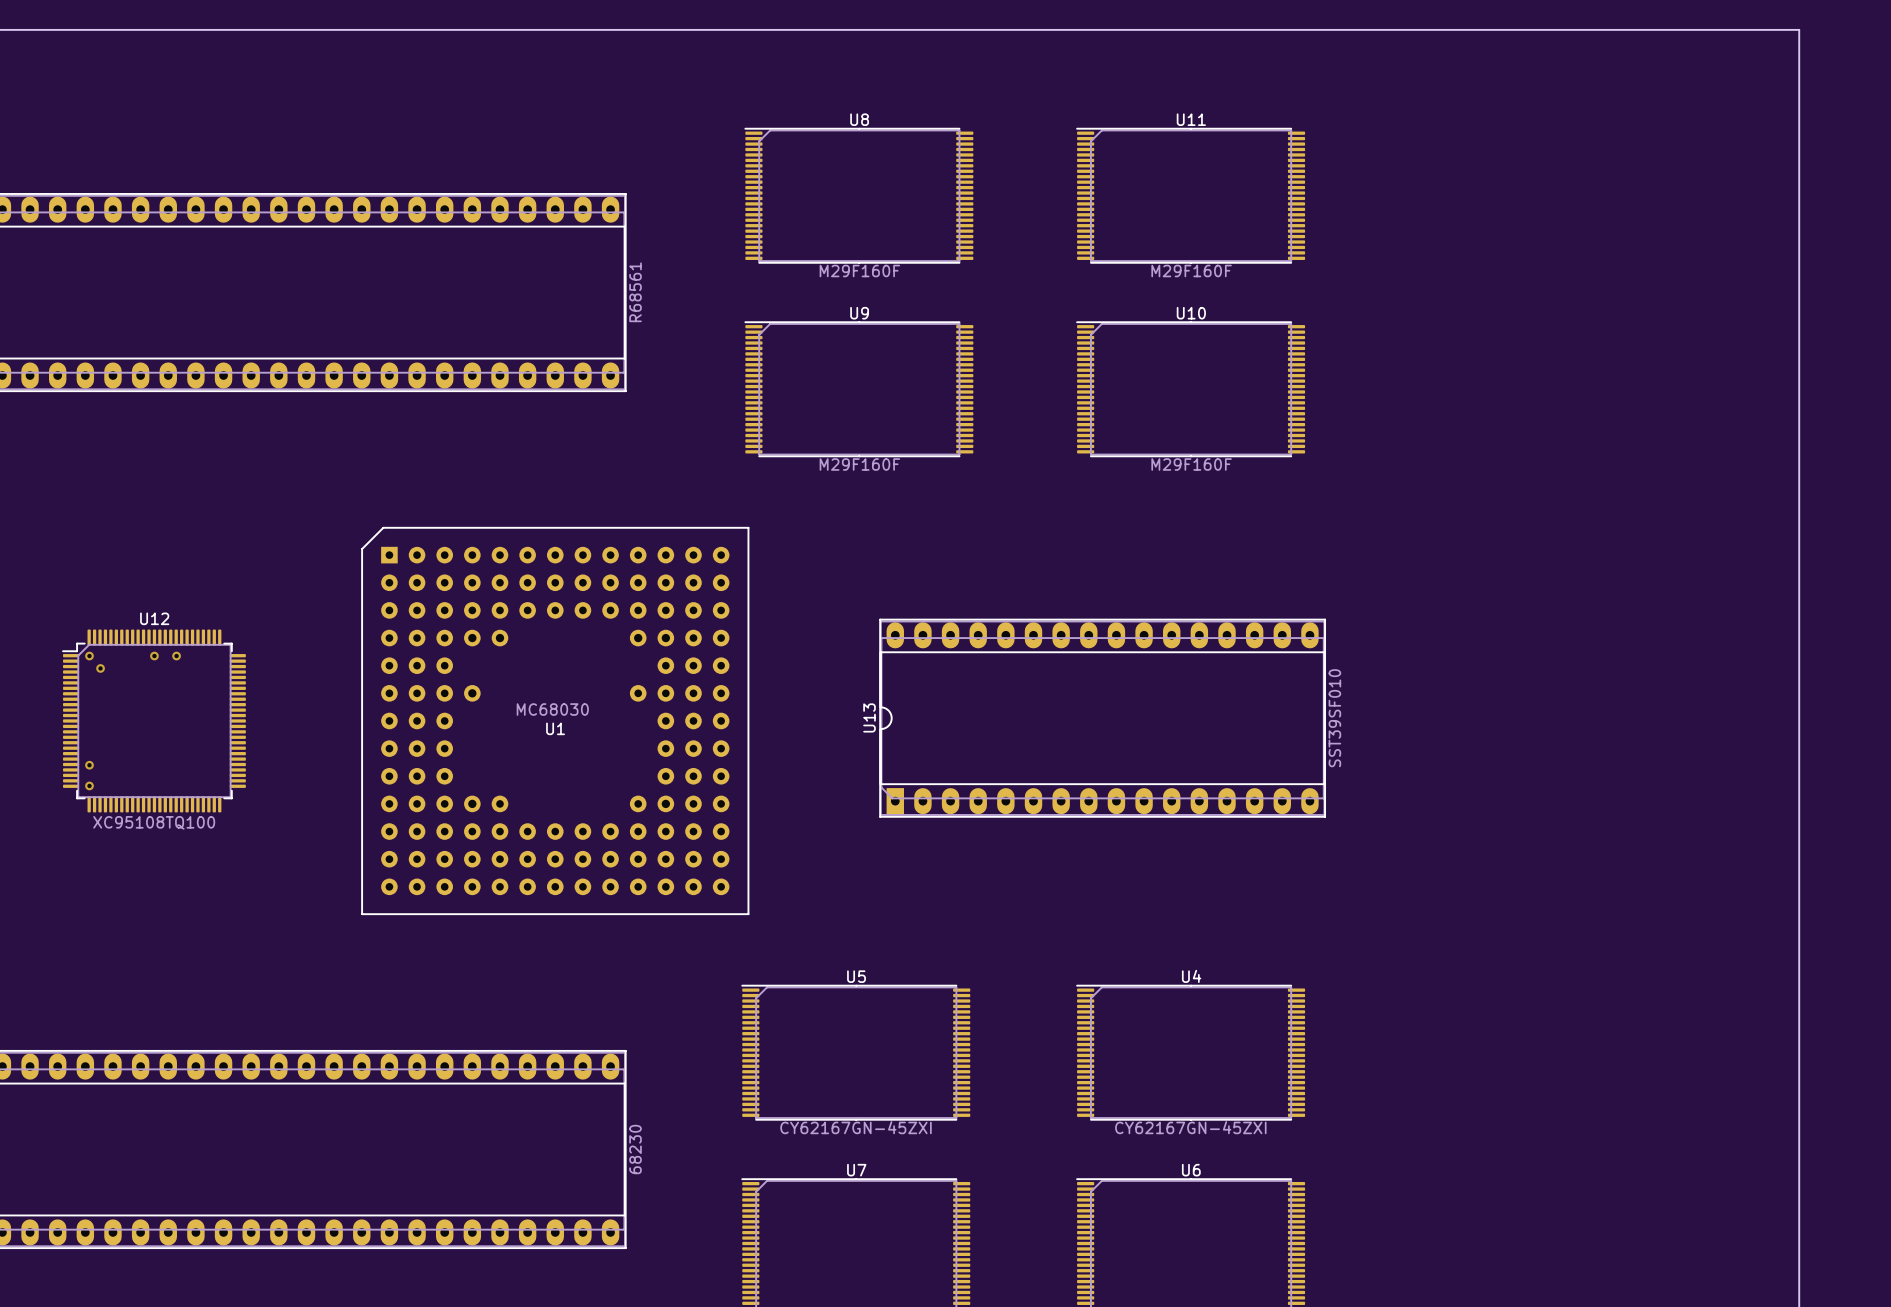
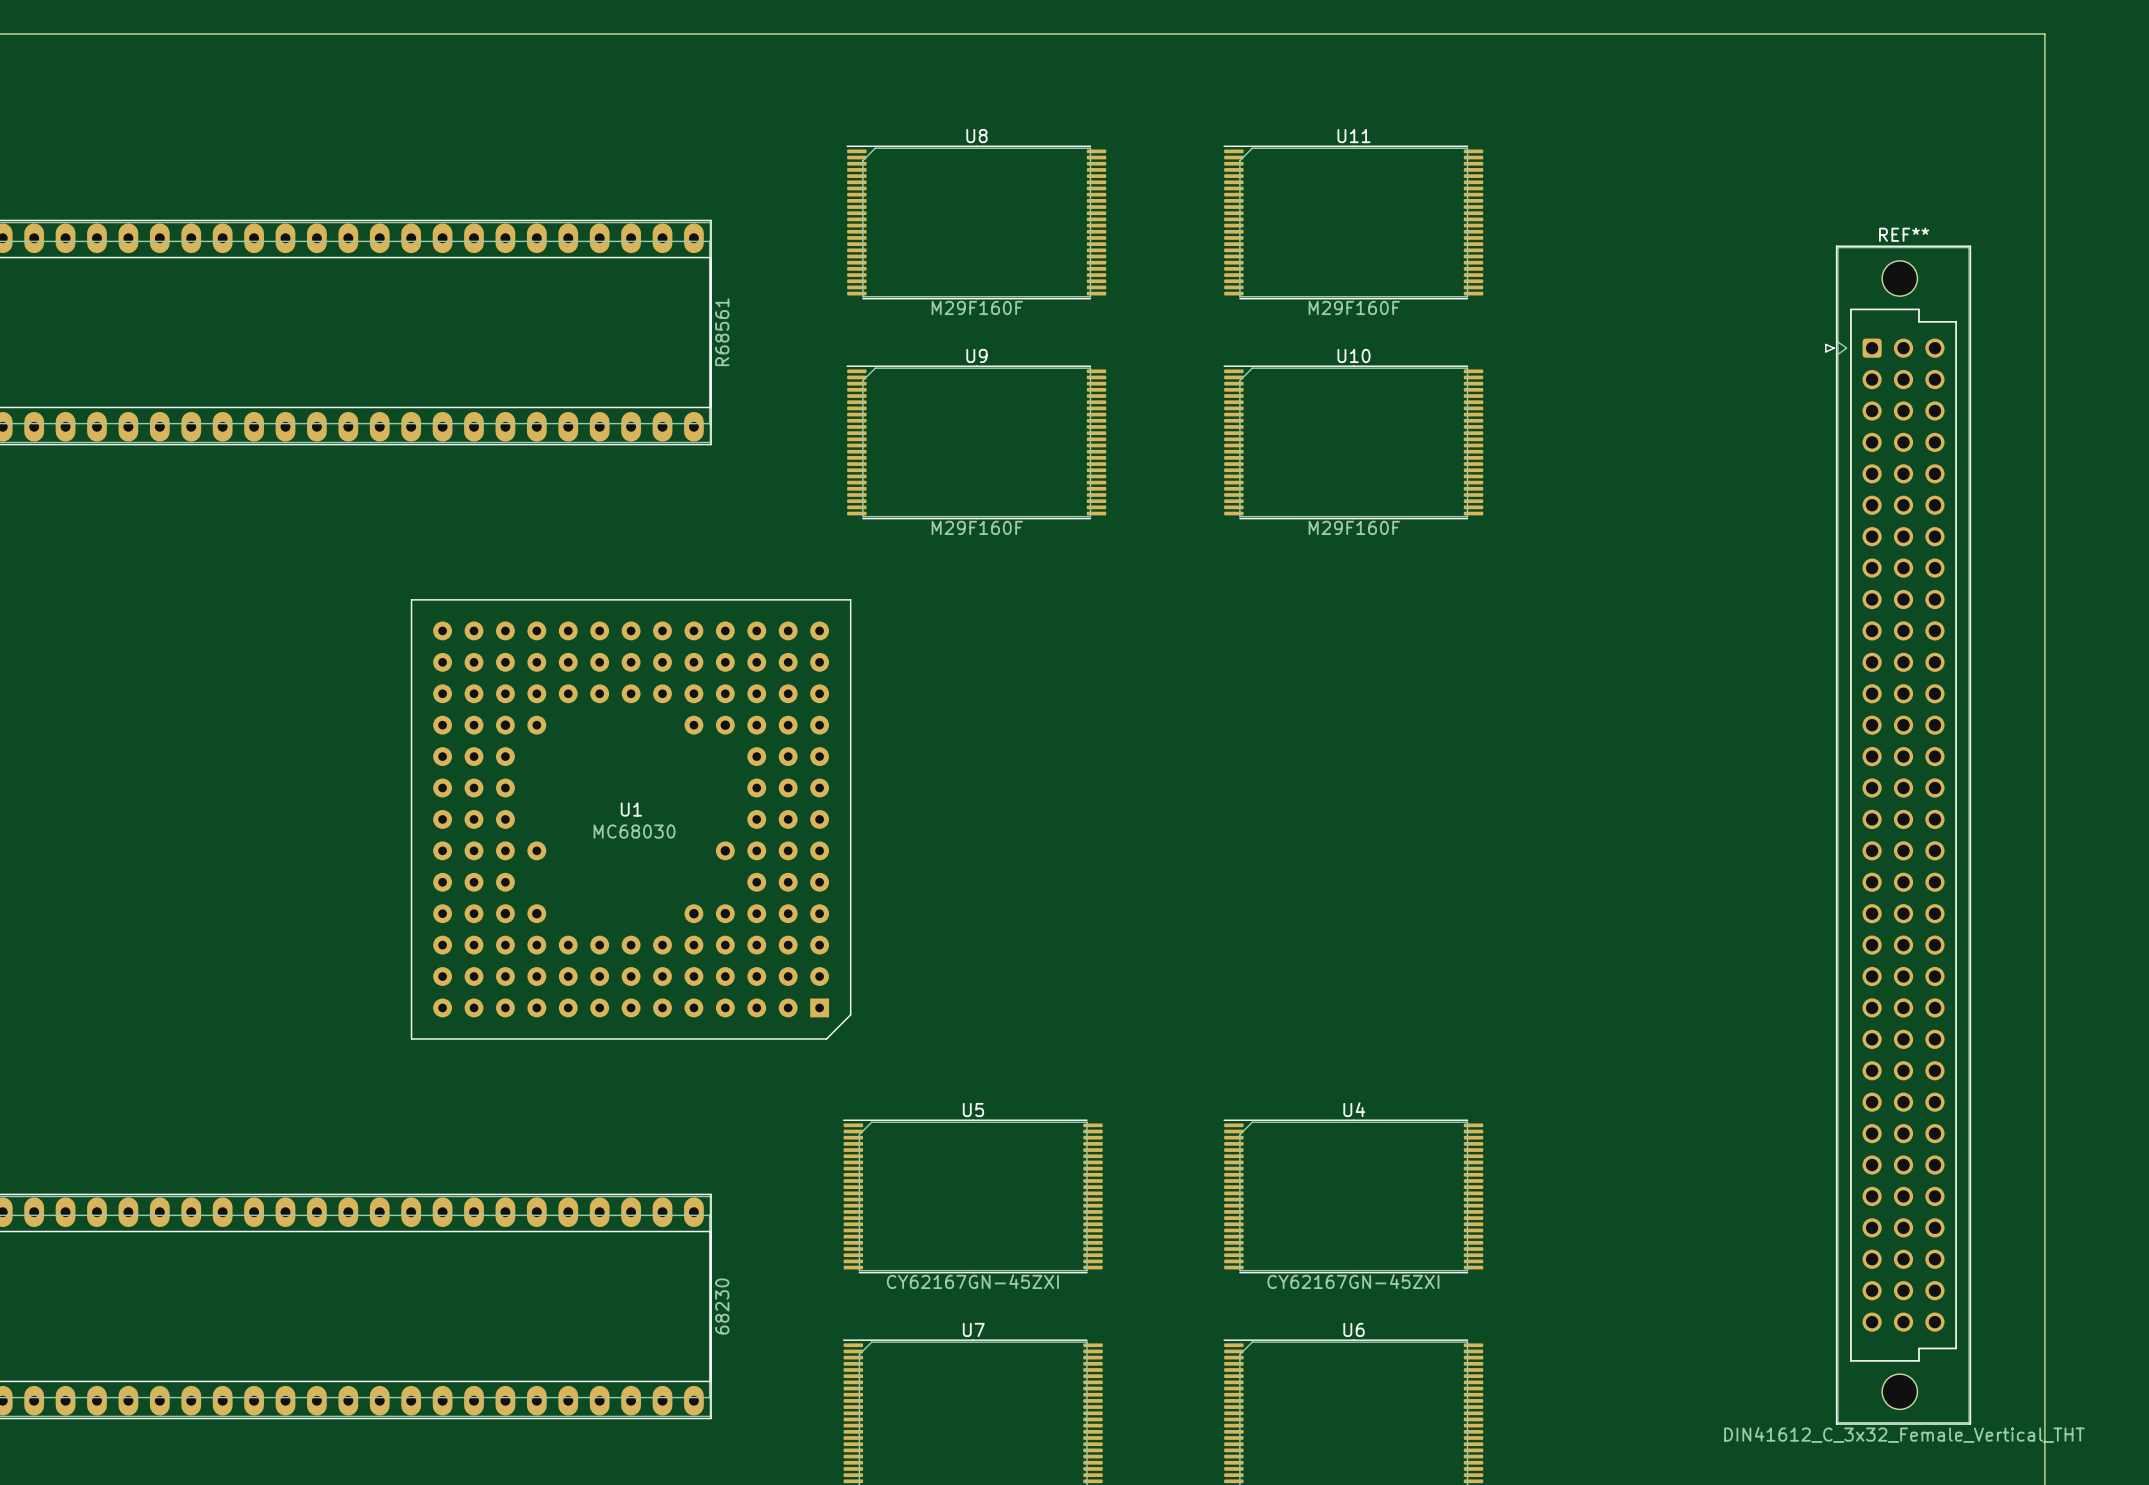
via: (89, 656) -> none
via: (154, 656) -> none
via: (176, 656) -> none
via: (100, 668) -> none
U13: SST39SF010 (1102, 718) -> none
U12: XC95108TQ100 (154, 720) -> none
U1 rotation: 0° (555, 720) -> 180° (631, 819)
REF**: none -> DIN41612_C_3x32_Female_Vertical_THT (1898, 835)
via: (89, 765) -> none
via: (89, 785) -> none

